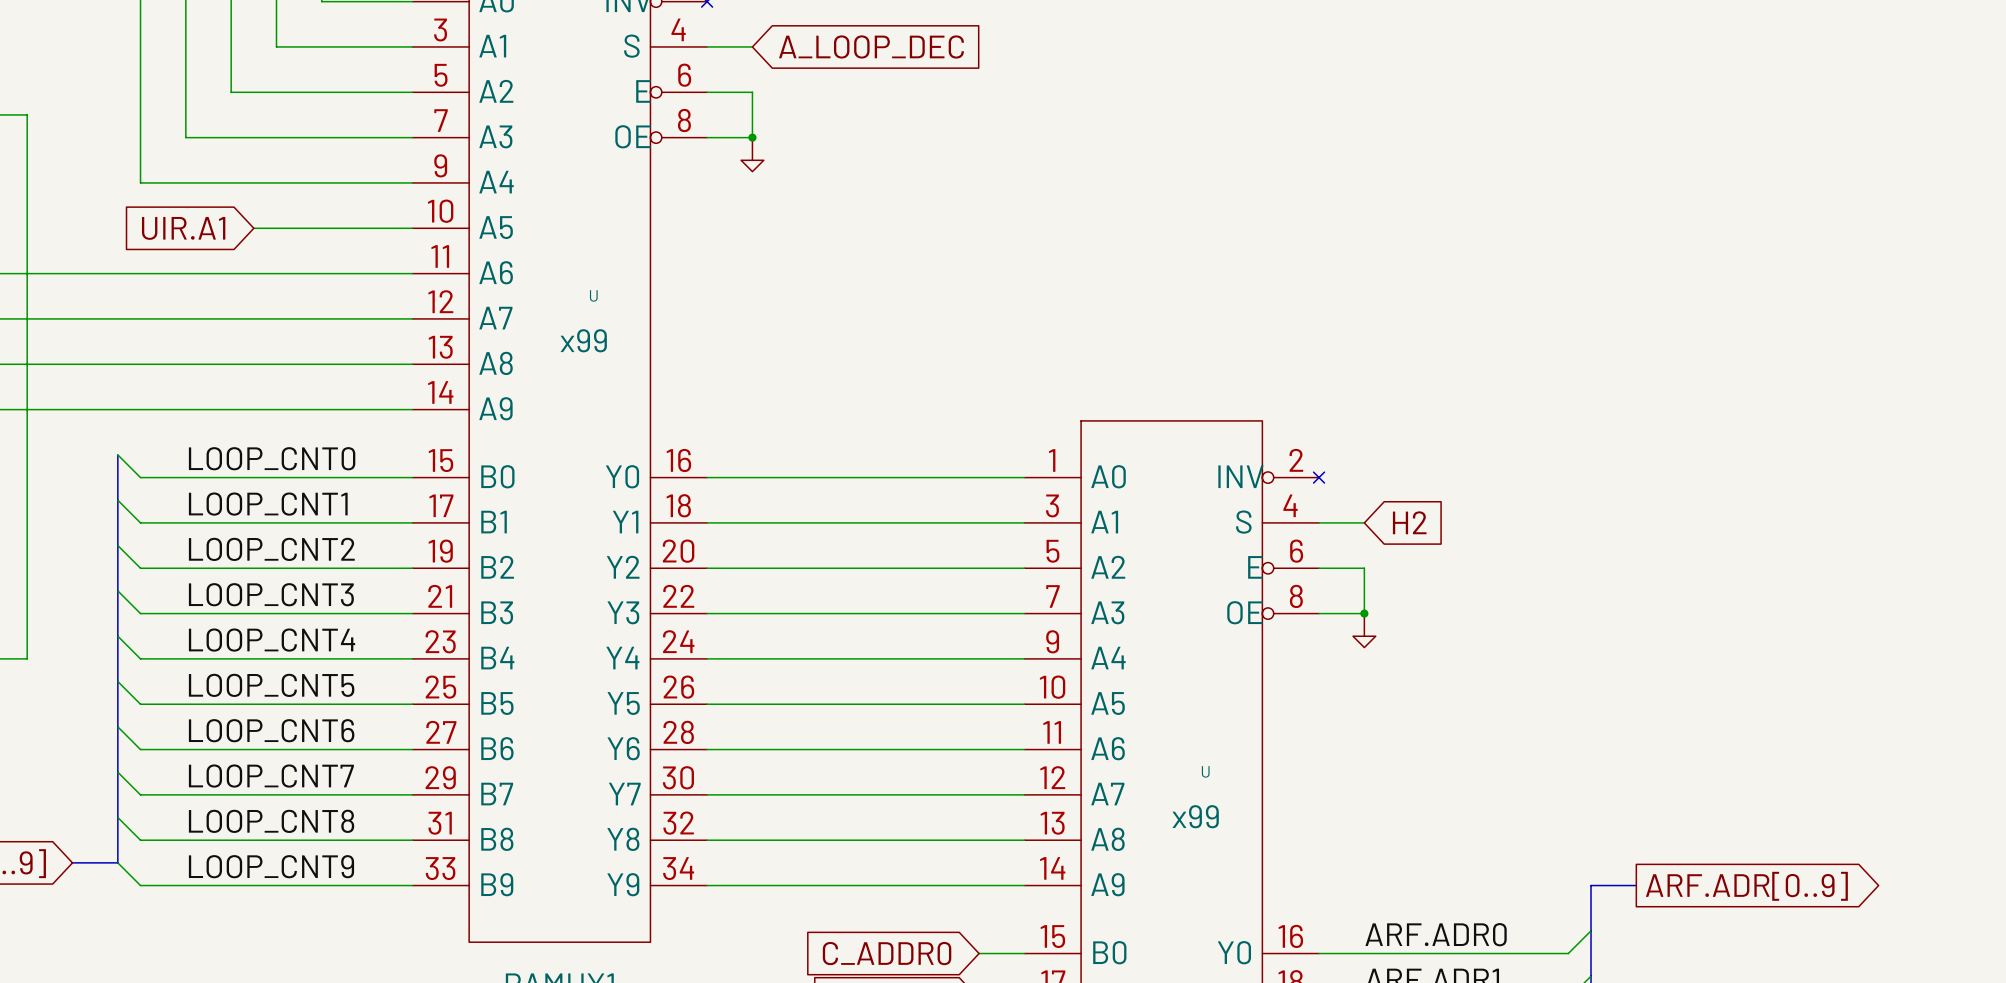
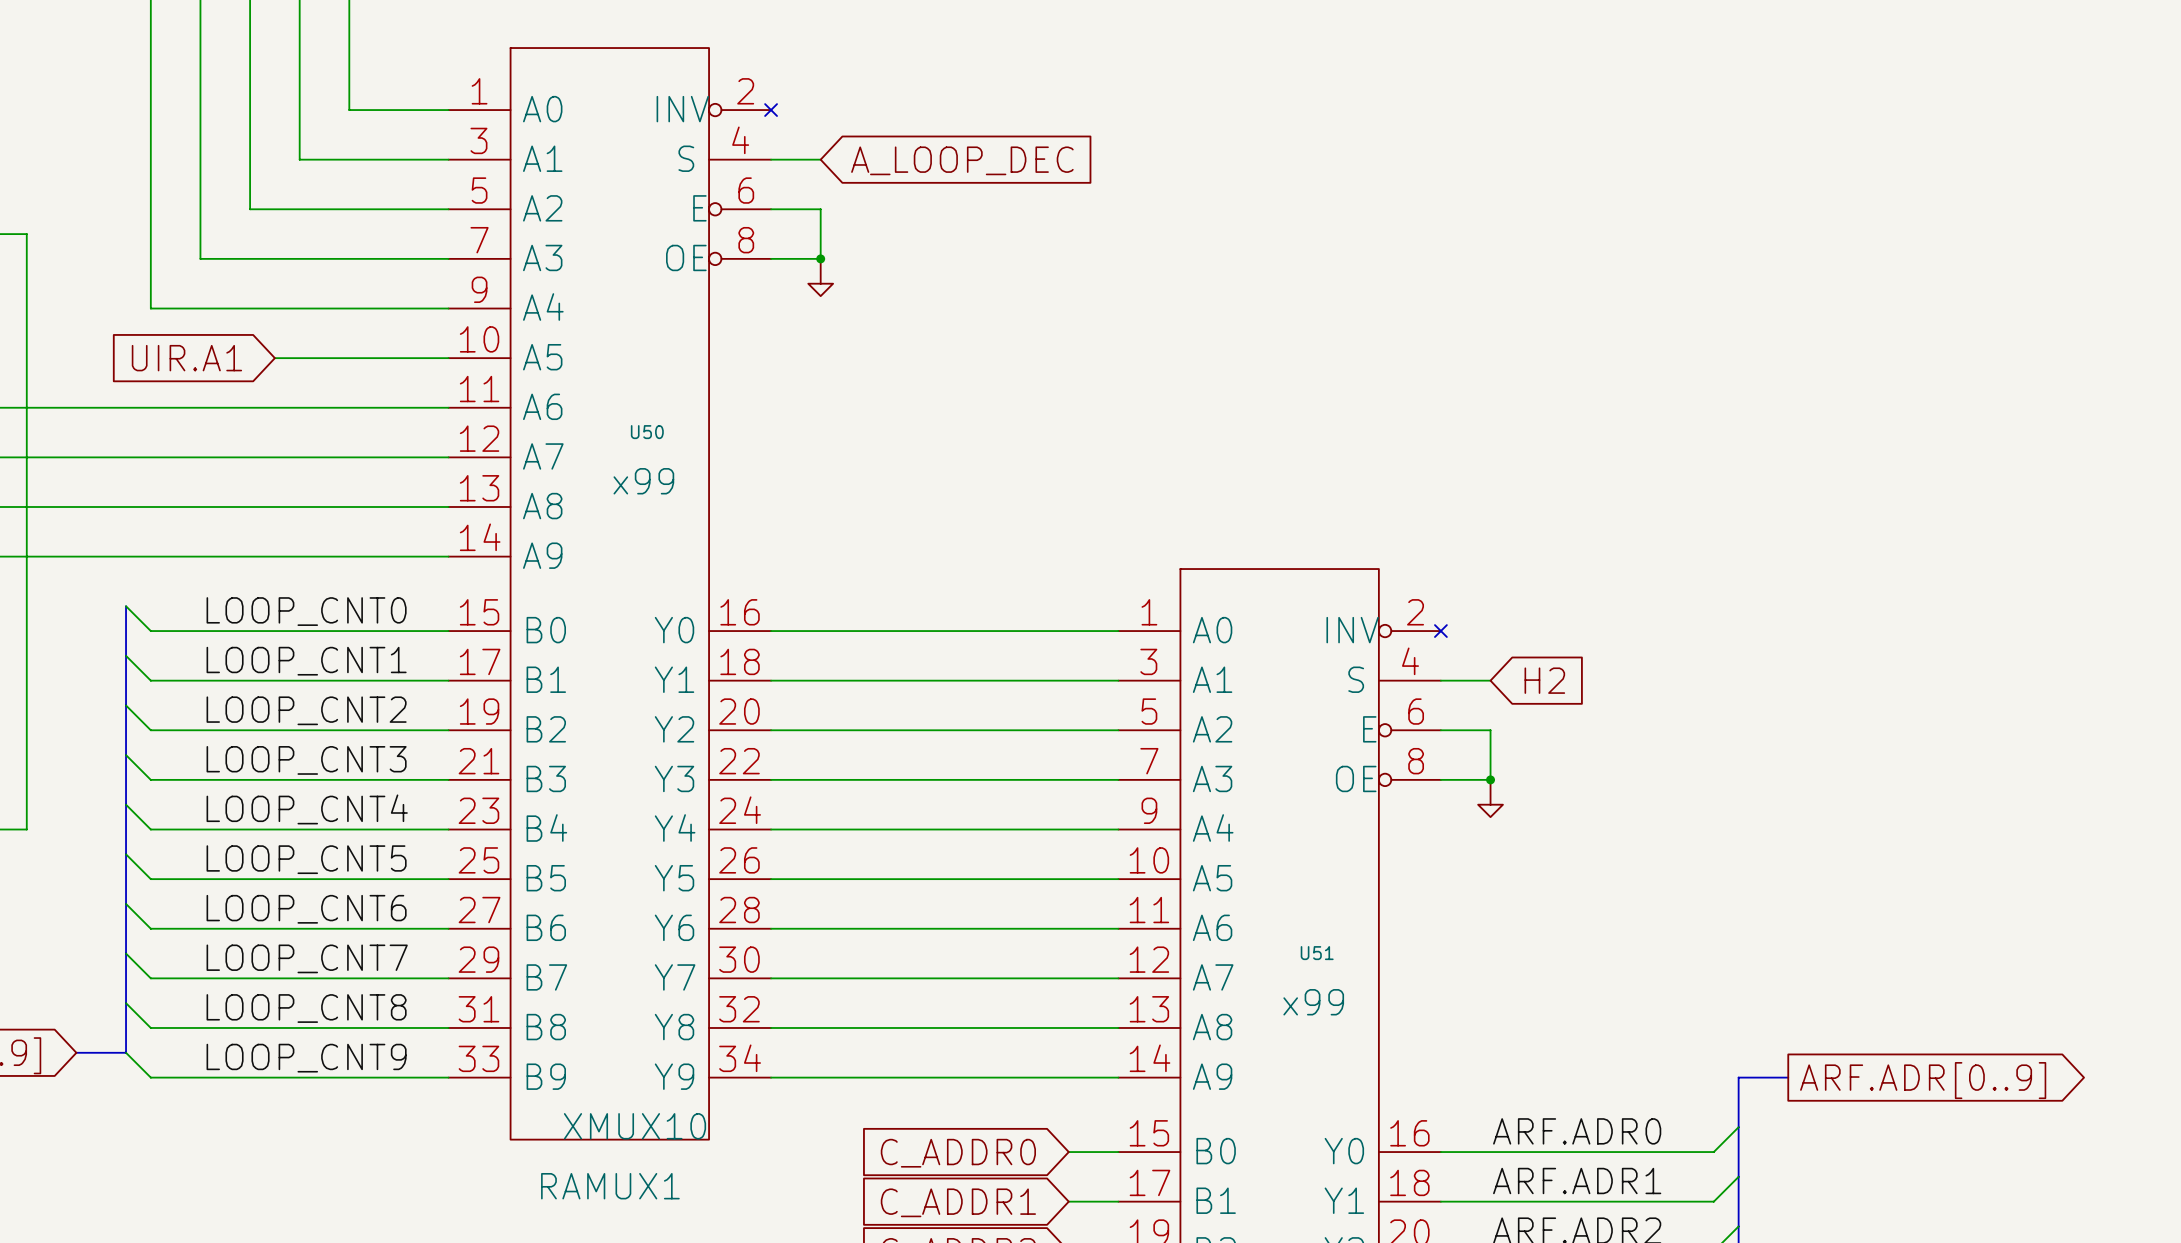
U name: U (593, 295) -> U50 (647, 432)
U name: U (1205, 771) -> U51 (1317, 953)
U value: none -> XMUX10 (635, 1126)

